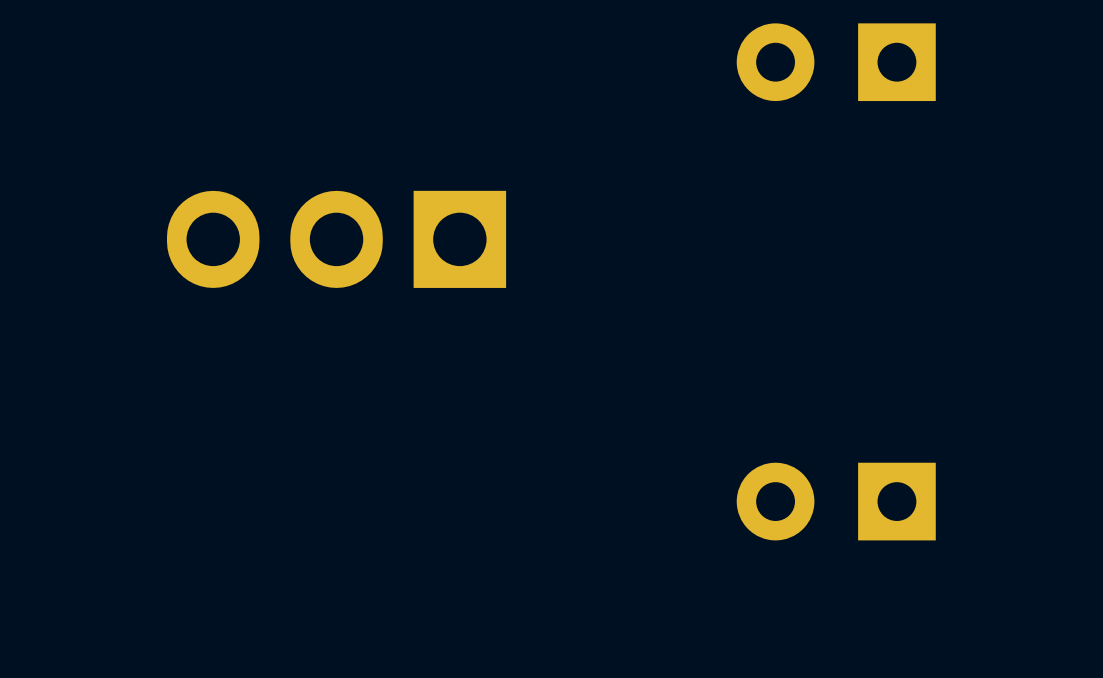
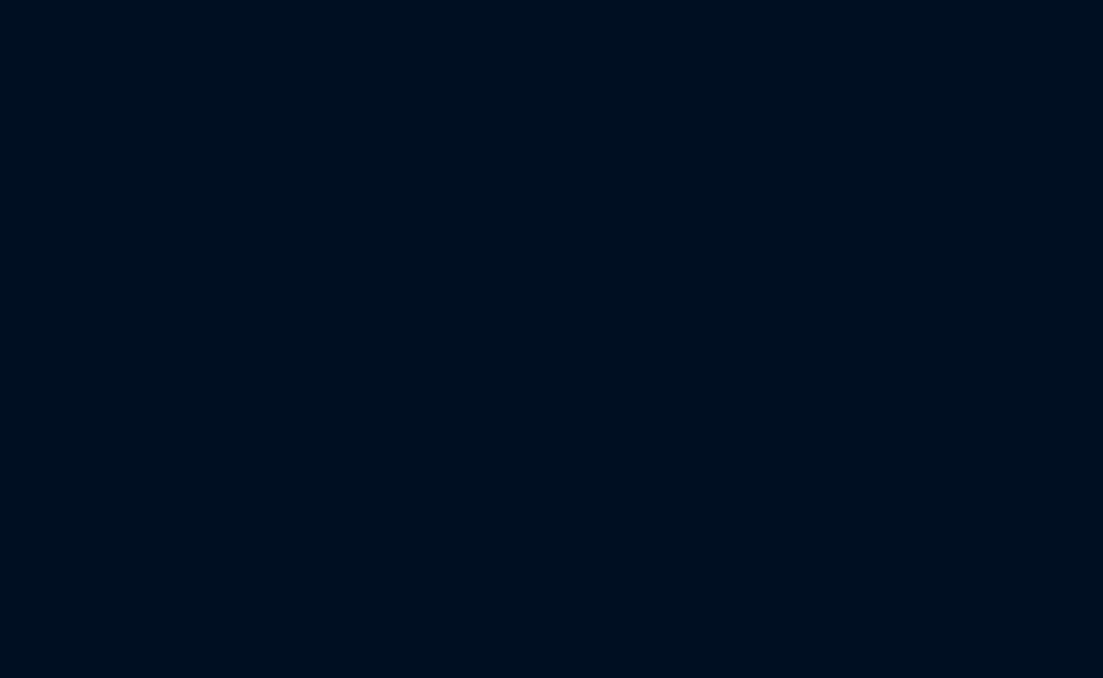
part: (836, 62) -> none
part: (336, 239) -> none
part: (836, 501) -> none

